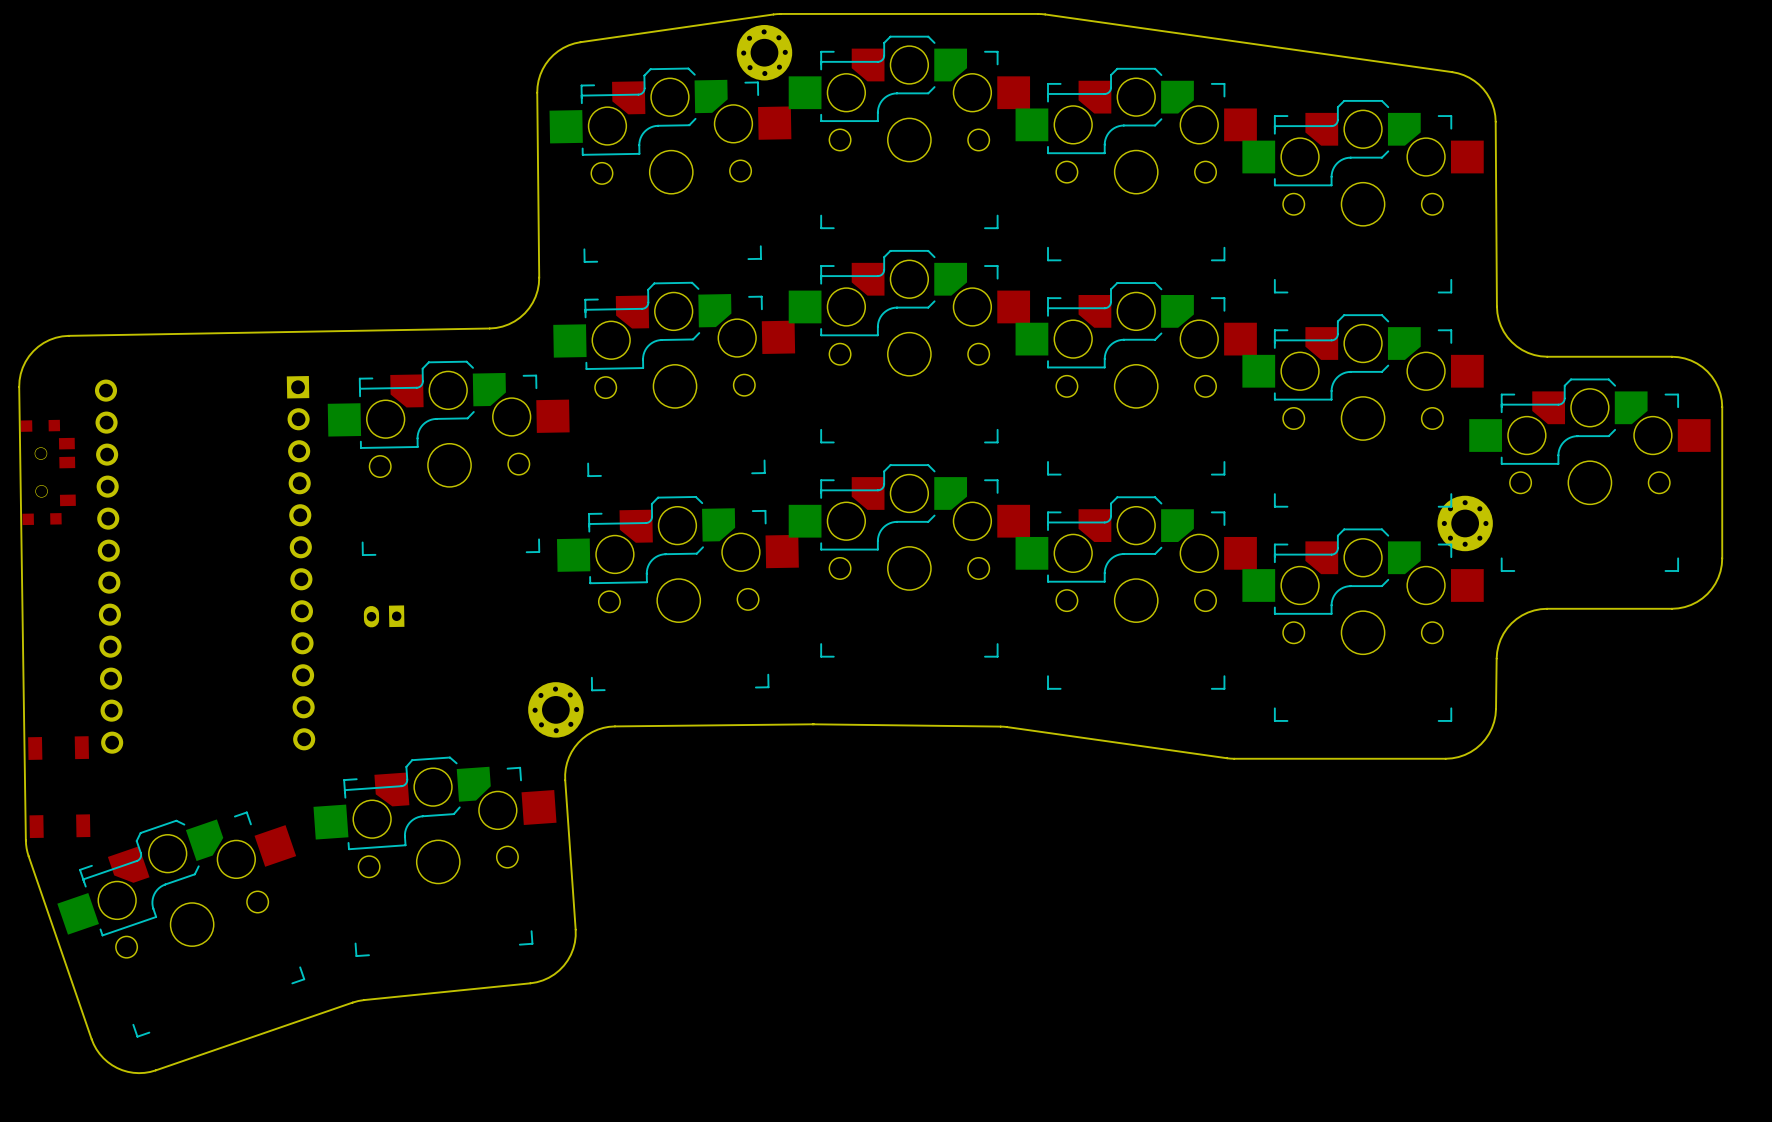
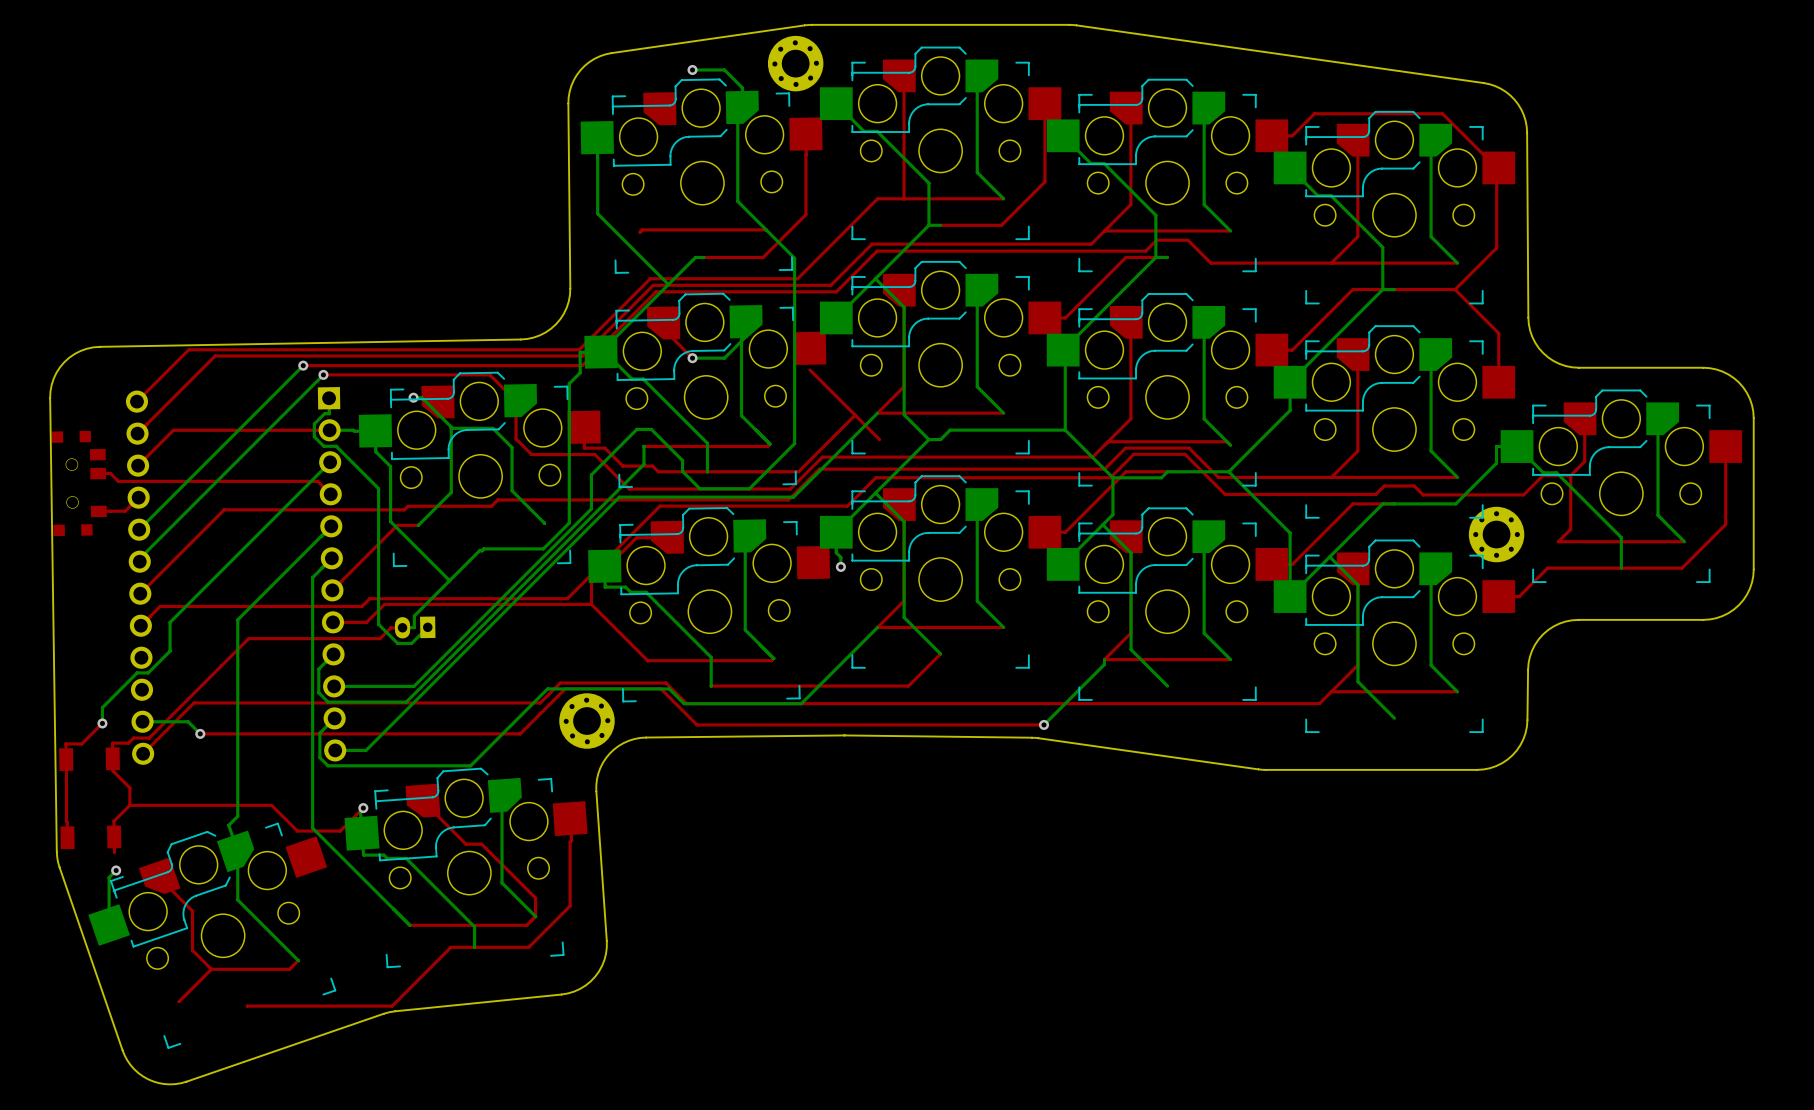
bottom track: none -> (692, 69) (724, 69) (742, 87) (742, 107) (737, 112) (737, 201) (794, 258) (794, 443) (749, 488) (699, 488) (682, 471) (682, 460) (651, 429) (636, 429) (591, 474) (591, 508) (413, 686) (334, 686)
via: none -> (692, 69)
top track: none -> (899, 75) (904, 80) (904, 198)
bottom track: none -> (981, 75) (977, 80) (977, 172) (1003, 198)
bottom track: none -> (836, 103) (864, 131) (877, 131) (928, 183) (928, 225)
top track: none -> (1044, 103) (1044, 181) (1001, 225) (940, 225)
top track: none -> (1126, 108) (1130, 112) (1130, 204) (1091, 244) (872, 244) (830, 285) (653, 285) (582, 355) (215, 355) (137, 433)
bottom track: none -> (1208, 108) (1204, 112) (1204, 204) (1230, 230)
bottom track: none -> (1063, 135) (1090, 163) (1104, 163) (1155, 215) (1155, 257)
top track: none -> (1271, 135) (1292, 135) (1314, 113) (1442, 113) (1496, 167)
bottom track: none -> (597, 137) (597, 213) (668, 284)
top track: none -> (1353, 140) (1357, 144) (1357, 236) (1331, 263)
bottom track: none -> (1435, 140) (1431, 144) (1431, 236) (1457, 263)
top track: none -> (806, 144) (805, 134) (805, 214) (763, 257) (703, 257)
bottom track: none -> (1290, 167) (1317, 195) (1331, 195) (1382, 247) (1382, 289)
top track: none -> (1496, 167) (1496, 247) (1455, 289)
top track: none -> (1003, 198) (877, 198) (797, 278) (650, 278) (579, 349) (188, 349) (136, 401)
bottom track: none -> (928, 225) (836, 317)
bottom track: none -> (940, 225) (928, 225)
top track: none -> (766, 229) (642, 229) (640, 232) (641, 231)
top track: none -> (1230, 230) (1104, 230)
bottom track: none -> (703, 257) (695, 257) (668, 284)
bottom track: none -> (1155, 257) (1063, 350)
top track: none -> (1167, 257) (1125, 257) (1065, 317) (1044, 317)
bottom track: none -> (1167, 257) (1155, 257)
top track: none -> (1457, 263) (1210, 263) (1188, 240) (1156, 240) (1145, 251) (877, 251) (836, 291) (656, 291) (582, 365) (303, 365)
bottom track: none -> (875, 278) (904, 307) (904, 414) (928, 439)
bottom track: none -> (668, 284) (603, 350)
bottom track: none -> (1382, 289) (1290, 382) (1290, 410) (1228, 471)
bottom track: none -> (1394, 289) (1382, 289)
top track: none -> (1455, 289) (1352, 289) (1292, 350) (1271, 350)
top track: none -> (1455, 289) (1498, 333) (1498, 382)
top track: none -> (899, 290) (903, 294) (903, 386) (877, 413) (1003, 413)
bottom track: none -> (981, 290) (977, 294) (977, 386) (1003, 413)
top track: none -> (1126, 322) (1130, 327) (1130, 418) (1092, 457) (822, 457) (790, 489) (629, 489) (594, 454) (531, 454) (516, 438) (516, 401) (489, 374) (323, 374)
bottom track: none -> (1208, 322) (1204, 327) (1204, 418) (1230, 445)
top track: none -> (663, 323) (663, 329) (692, 358)
bottom track: none -> (1065, 348) (1065, 430)
bottom track: none -> (603, 350) (631, 379) (643, 379) (707, 443) (707, 471)
bottom track: none -> (603, 350) (580, 352) (580, 372) (569, 383) (569, 522) (543, 548) (483, 548) (479, 550) (449, 580)
top track: none -> (1353, 354) (1357, 359) (1357, 451) (1331, 477)
bottom track: none -> (1435, 354) (1431, 359) (1431, 451) (1457, 477)
bottom track: none -> (692, 358) (724, 358) (746, 336) (746, 321) (741, 326) (741, 415) (770, 444)
via: none -> (692, 358)
bottom track: none -> (303, 365) (139, 529)
via: none -> (303, 365)
top track: none -> (810, 370) (879, 439)
bottom track: none -> (323, 374) (139, 558) (139, 561)
via: none -> (323, 374)
bottom track: none -> (413, 397) (421, 397) (451, 427) (451, 492) (418, 525)
via: none -> (413, 397)
bottom track: none -> (329, 405) (329, 398) (329, 413) (324, 413) (314, 424) (314, 436) (323, 446) (336, 446) (378, 488) (378, 624) (397, 643) (411, 643) (427, 627)
bottom track: none -> (877, 413) (793, 497) (619, 497) (366, 750) (335, 750)
top track: none -> (855, 415) (798, 471) (658, 471) (652, 466) (622, 466) (604, 448) (584, 448) (584, 427) (584, 437)
top track: none -> (1580, 418) (1584, 423) (1584, 461) (1570, 475)
bottom track: none -> (1662, 418) (1658, 423) (1658, 515) (1684, 541)
bottom track: none -> (451, 428) (492, 428) (512, 447) (512, 490) (544, 523)
top track: none -> (329, 430) (173, 430) (138, 465)
bottom track: none -> (329, 430) (375, 430) (375, 451) (390, 466) (390, 521) (449, 580)
bottom track: none -> (1065, 430) (950, 430) (940, 439) (928, 439)
bottom track: none -> (1065, 430) (1112, 477)
bottom track: none -> (928, 439) (836, 532) (836, 552) (840, 557) (840, 566)
top track: none -> (1108, 441) (1227, 441) (1230, 445)
top track: none -> (768, 445) (770, 444) (767, 446) (643, 446)
bottom track: none -> (643, 446) (643, 464) (406, 702) (328, 702) (318, 692) (318, 669) (333, 654)
top track: none -> (1725, 446) (1725, 524) (1681, 568) (1547, 568) (1519, 596) (1498, 596)
bottom track: none -> (330, 462) (170, 622) (170, 651) (148, 672) (137, 672) (102, 707) (102, 723)
top track: none -> (1167, 471) (1125, 471) (1065, 532) (1044, 532)
bottom track: none -> (1228, 471) (1290, 533) (1290, 596) (1382, 503) (1455, 503) (1496, 463) (1496, 446) (1517, 446) (1543, 472) (1556, 472) (1621, 537) (1621, 568)
bottom track: none -> (1228, 471) (1167, 471) (1161, 477) (1112, 477)
top track: none -> (98, 473) (110, 473) (118, 481) (317, 481) (330, 494)
top track: none -> (1570, 475) (1570, 529) (1558, 541) (1684, 541)
top track: none -> (1570, 475) (1543, 475) (1523, 494) (1423, 494) (1414, 486) (1384, 486) (1375, 494) (1225, 494) (1185, 454) (1133, 454) (1110, 477) (875, 477) (847, 506) (660, 506) (567, 598) (369, 598) (362, 606) (160, 606) (140, 625) (150, 616)
bottom track: none -> (1112, 477) (1112, 514) (1063, 564)
top track: none -> (1457, 477) (1218, 477) (1189, 448) (1125, 448) (1104, 469) (819, 469) (788, 499) (497, 499) (491, 506) (408, 506) (404, 509) (224, 509) (140, 593)
bottom track: none -> (875, 493) (904, 521) (904, 617) (940, 653)
top track: none -> (138, 497) (125, 511) (98, 511)
top track: none -> (1394, 503) (1352, 503) (1292, 564) (1271, 564)
top track: none -> (899, 504) (903, 509) (903, 601) (877, 627) (1003, 627)
bottom track: none -> (981, 504) (977, 509) (977, 601) (1003, 627)
bottom track: none -> (1102, 524) (1131, 553) (1131, 649) (1167, 686)
top track: none -> (418, 525) (397, 525) (332, 590)
bottom track: none -> (331, 526) (237, 619) (237, 816) (228, 825) (237, 851) (237, 899) (298, 960)
top track: none -> (1126, 536) (1130, 541) (1130, 633) (1104, 659) (1230, 659)
bottom track: none -> (1208, 536) (1204, 541) (1204, 633) (1230, 659)
top track: none -> (667, 537) (636, 537) (591, 582) (591, 604)
bottom track: none -> (747, 538) (749, 535) (745, 540) (745, 629) (773, 658) (759, 644)
bottom track: none -> (1329, 556) (1357, 585) (1357, 681) (1394, 718)
bottom track: none -> (604, 566) (605, 587) (625, 587) (630, 592) (646, 592) (711, 657) (711, 686)
via: none -> (840, 566)
bottom track: none -> (322, 567) (331, 558) (312, 577) (312, 828) (409, 925)
top track: none -> (1353, 568) (1357, 573) (1357, 665) (1319, 703) (686, 703) (665, 683) (560, 683) (540, 702) (193, 702) (143, 753)
bottom track: none -> (1435, 568) (1431, 573) (1431, 665) (1457, 691)
bottom track: none -> (449, 580) (414, 615) (414, 627) (402, 627)
top track: none -> (591, 604) (384, 604) (366, 622) (332, 622)
top track: none -> (591, 604) (647, 660) (771, 660) (773, 658)
top track: none -> (402, 627) (390, 627) (380, 638) (248, 638) (149, 738) (133, 738) (128, 743) (112, 743) (112, 758)
bottom track: none -> (877, 627) (801, 703) (684, 703) (669, 688) (547, 688) (470, 765) (327, 765) (319, 757) (319, 733) (334, 718)
top track: none -> (940, 653) (908, 686) (711, 686)
bottom track: none -> (1104, 659) (1104, 664) (1044, 724)
top track: none -> (1457, 691) (1331, 691)
bottom track: none -> (142, 721) (188, 721) (200, 733)
top track: none -> (102, 723) (81, 743) (65, 743) (67, 837) (67, 830)
via: none -> (102, 723)
top track: none -> (1044, 724) (697, 724) (660, 688) (565, 688) (520, 733) (200, 733)
via: none -> (1044, 724)
via: none -> (200, 733)
top track: none -> (112, 758) (113, 771) (129, 787) (129, 805)
bottom track: none -> (505, 795) (502, 798) (502, 882) (535, 916)
top track: none -> (422, 801) (465, 844) (481, 844) (535, 898) (535, 916) (526, 925) (409, 925)
top track: none -> (129, 805) (113, 821) (114, 852)
top track: none -> (129, 805) (271, 805) (297, 831) (340, 831) (363, 808)
bottom track: none -> (363, 808) (360, 811) (363, 855) (383, 855) (387, 858) (406, 858) (474, 926) (474, 947)
via: none -> (363, 808)
top track: none -> (570, 829) (570, 818) (571, 840) (570, 842) (570, 905) (528, 947) (450, 947) (392, 1006) (247, 1006)
bottom track: none -> (116, 870) (109, 877) (109, 925)
via: none -> (116, 870)
top track: none -> (159, 878) (192, 911) (192, 950) (211, 969)
top track: none -> (298, 960) (289, 969) (211, 969)
top track: none -> (211, 969) (179, 1001)

